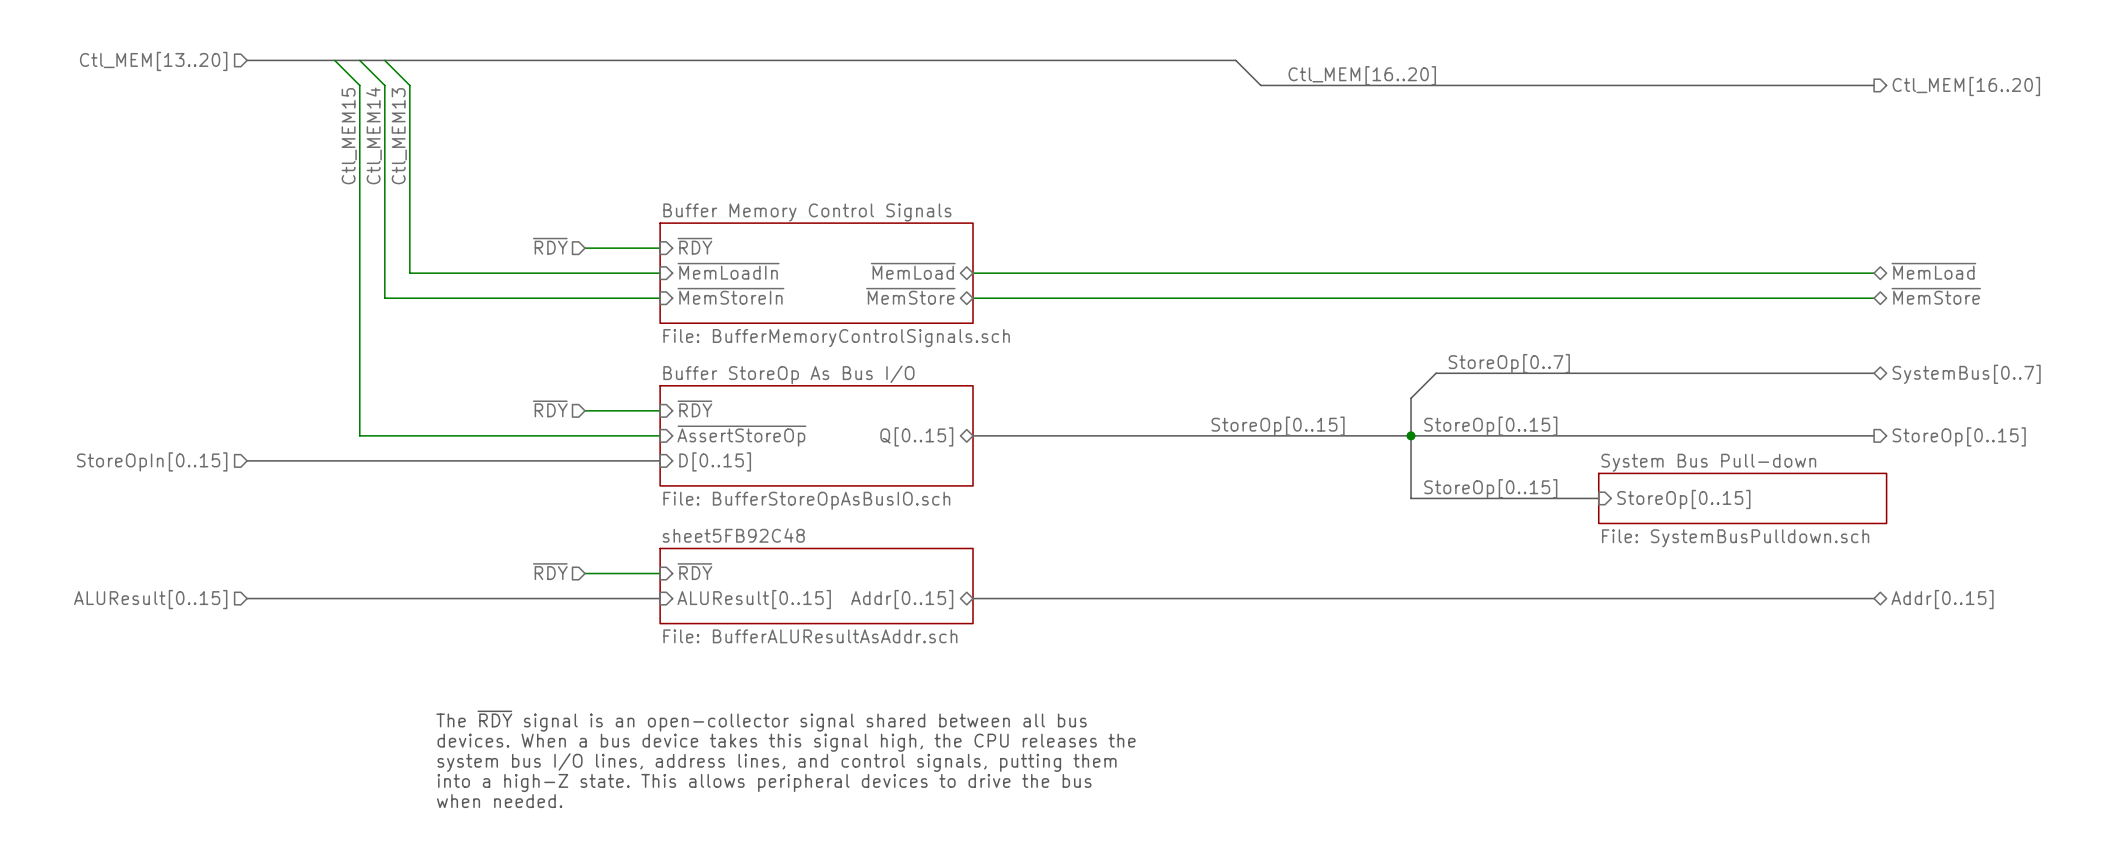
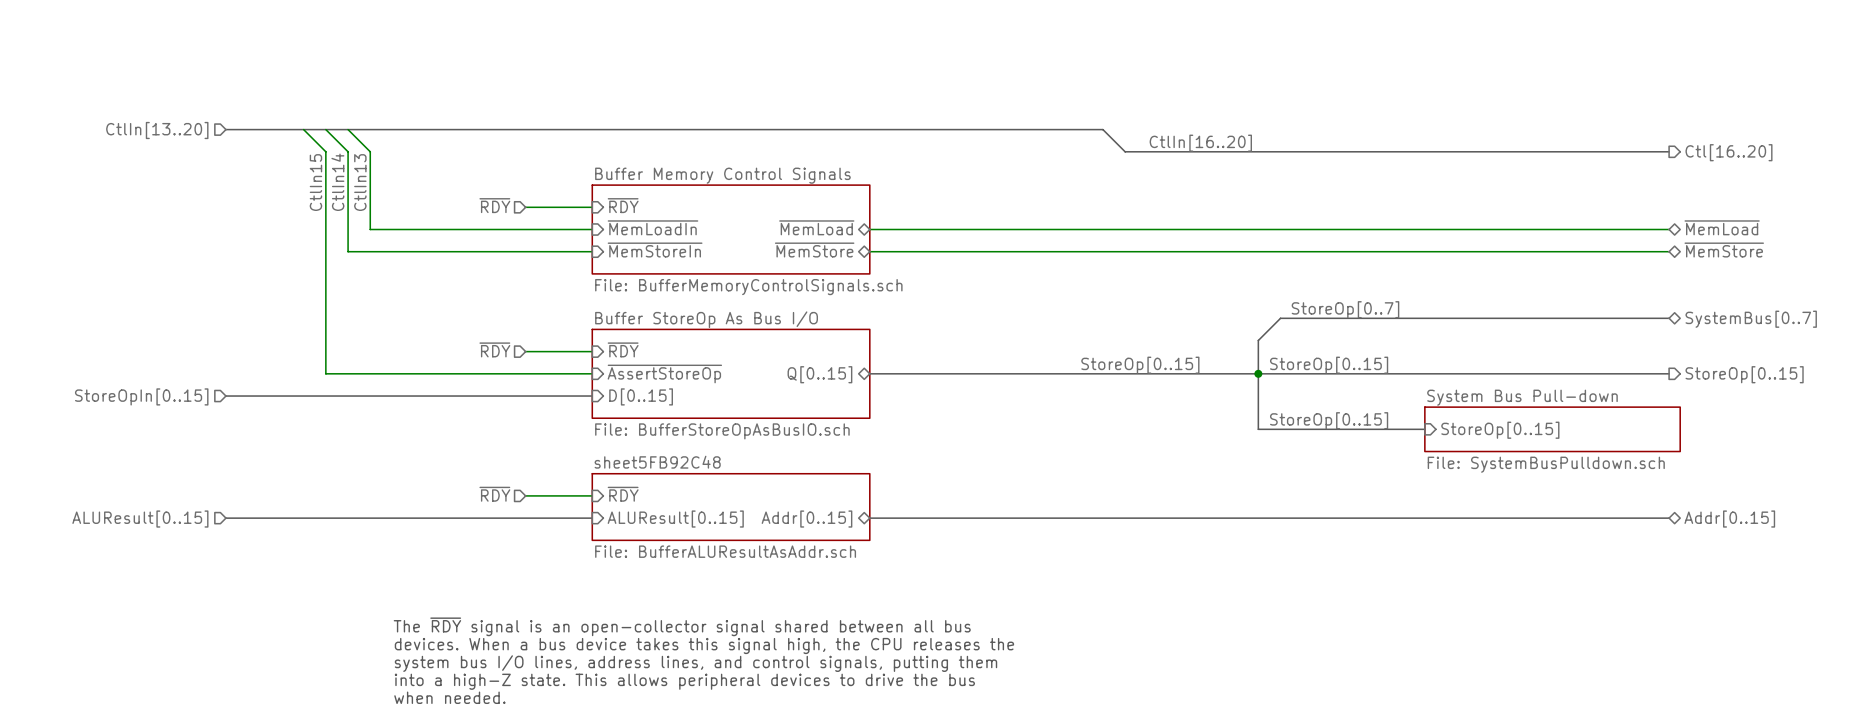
bus: (247, 60) (1235, 60) (1260, 85) (1874, 85) -> (225, 129) (1102, 129) (1125, 151) (1669, 151)
wire: (334, 60) (359, 85) (359, 185) -> (303, 129) (325, 151)
wire: (359, 60) (384, 85) (384, 185) -> (325, 129) (348, 151)
wire: (384, 60) (409, 85) (409, 185) -> (348, 129) (370, 151)
hierarchical label: Ctl_MEM[13..20] (153, 61) -> none
label: Ctl_MEM[16..20] (1362, 75) -> none
hierarchical label: Ctl_MEM[16..20] (1966, 86) -> none
label: Ctl_MEM14 (373, 135) -> CtlIn14 (337, 182)
label: Ctl_MEM15 (349, 136) -> CtlIn15 (315, 182)
label: Ctl_MEM13 (399, 136) -> CtlIn13 (360, 182)
hierarchical label: none -> CtlIn[13..20] (157, 130)
label: none -> CtlIn[16..20] (1200, 143)
hierarchical label: none -> Ctl[16..20] (1728, 152)

